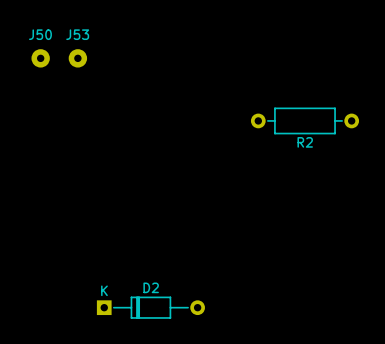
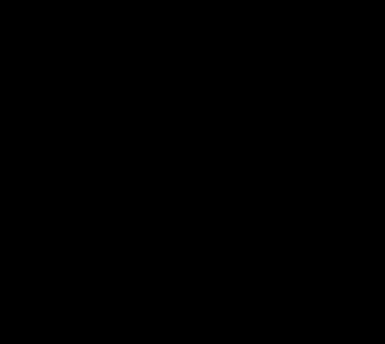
J50: (40, 58) -> none
J53: (77, 58) -> none
R2: (304, 120) -> none
D2: (150, 307) -> none

